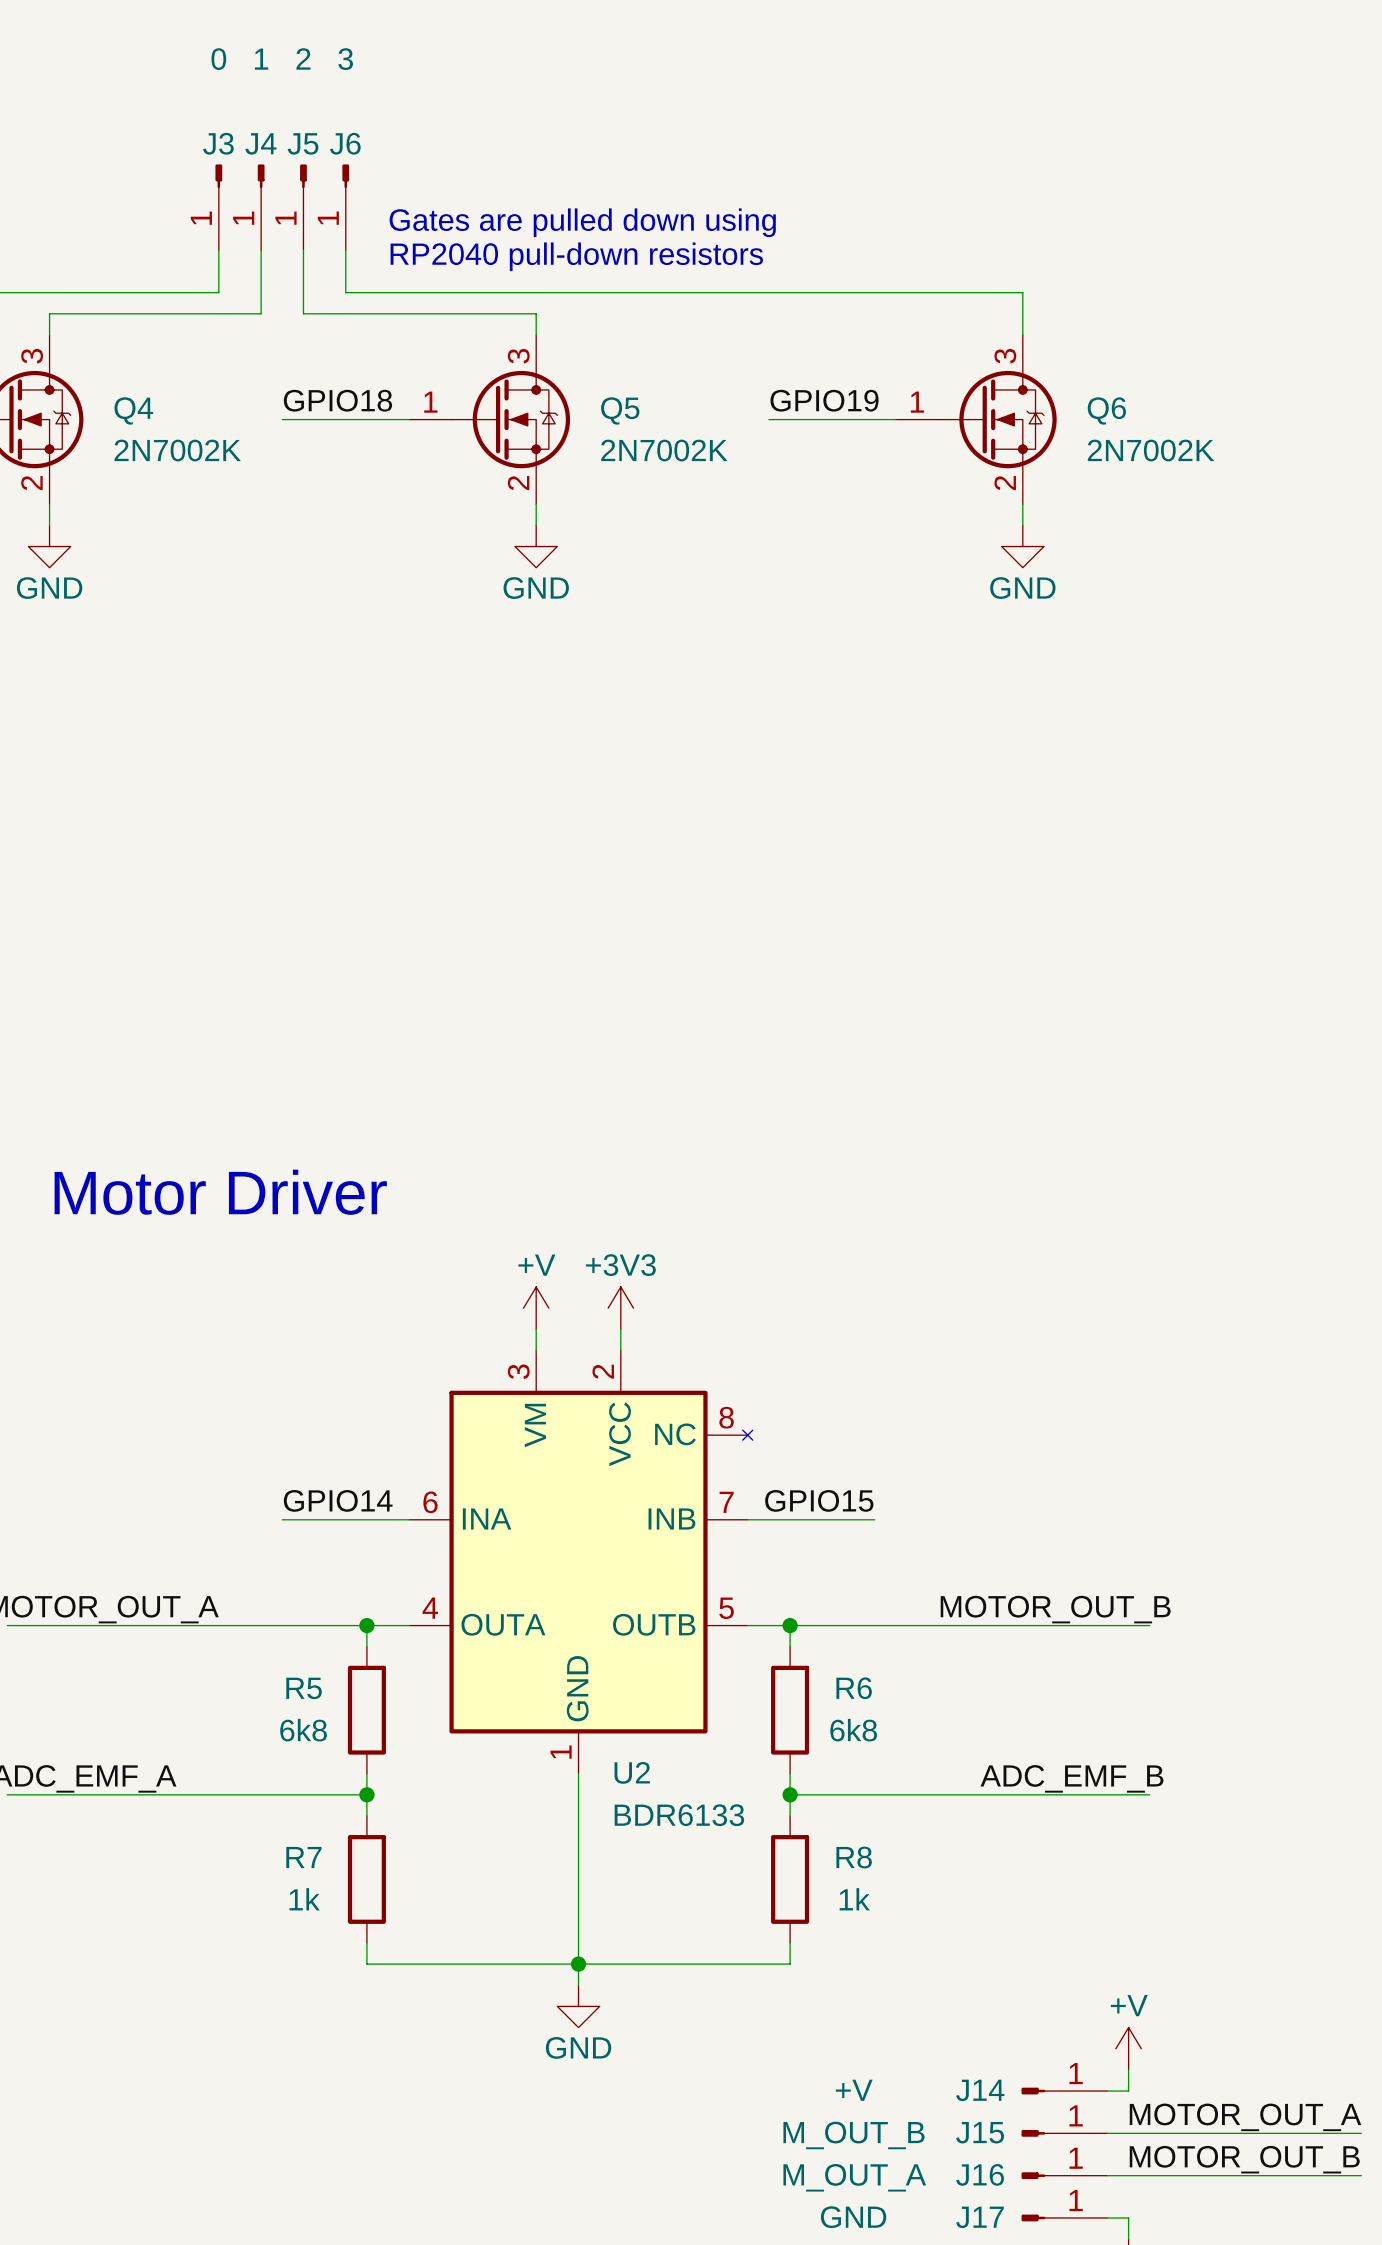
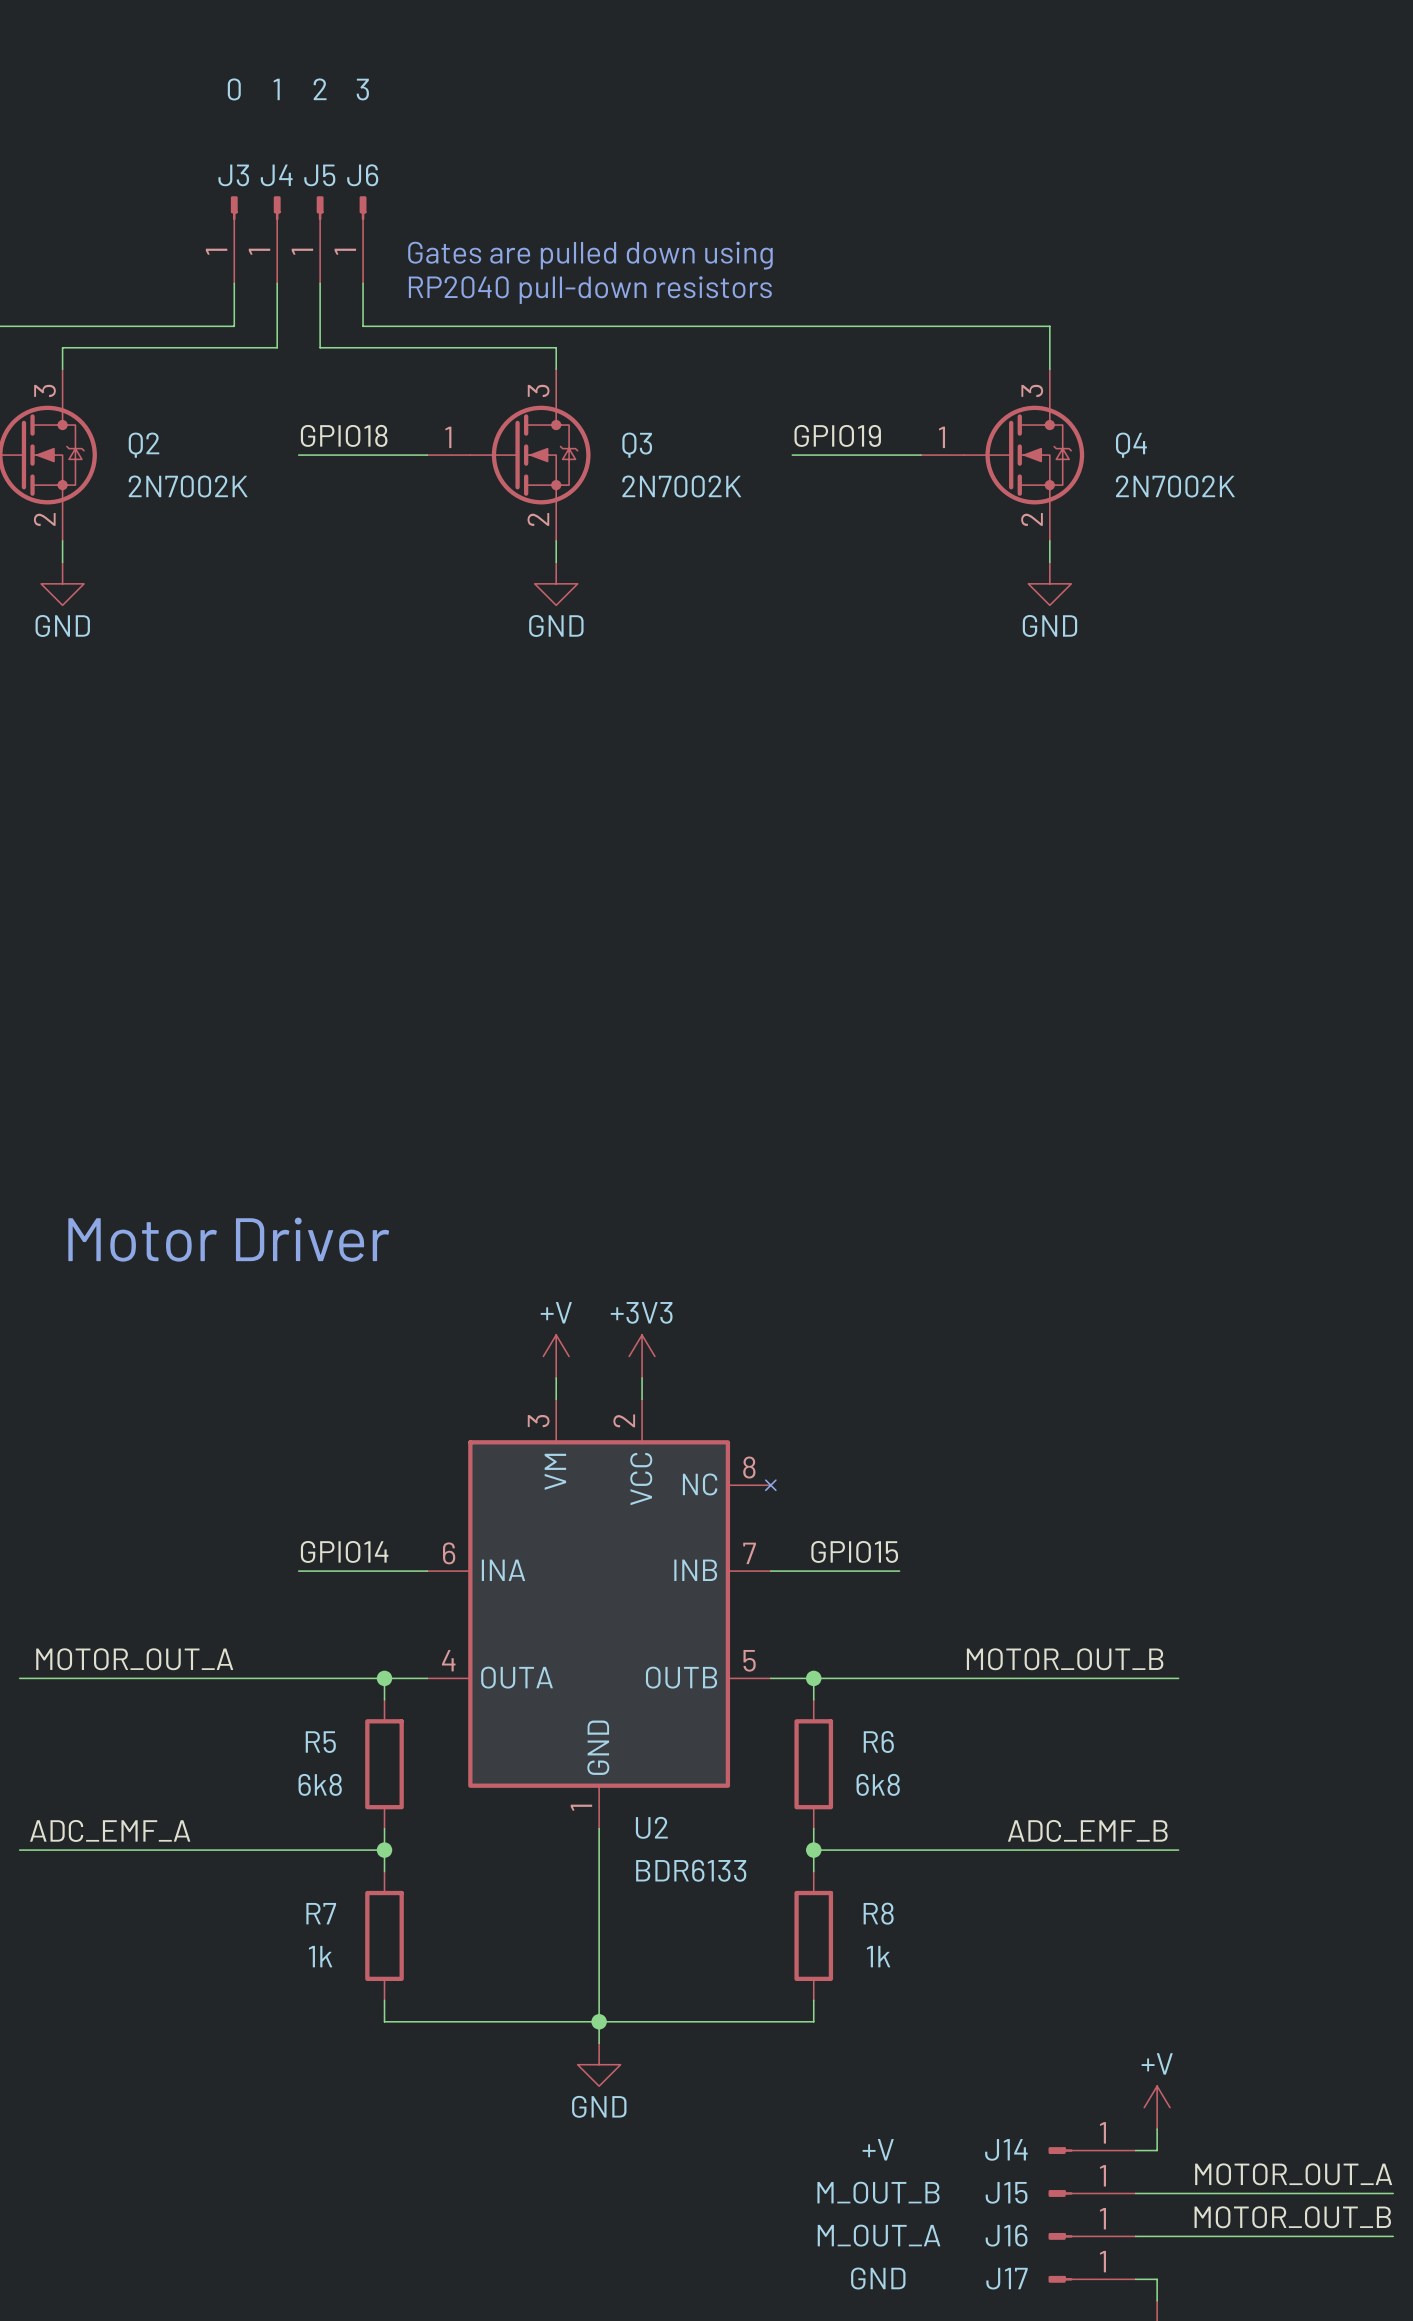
Q4 name: Q4 (133, 410) -> Q2 (144, 445)
Q5 name: Q5 (620, 410) -> Q3 (637, 445)
Q6 name: Q6 (1106, 410) -> Q4 (1131, 445)

